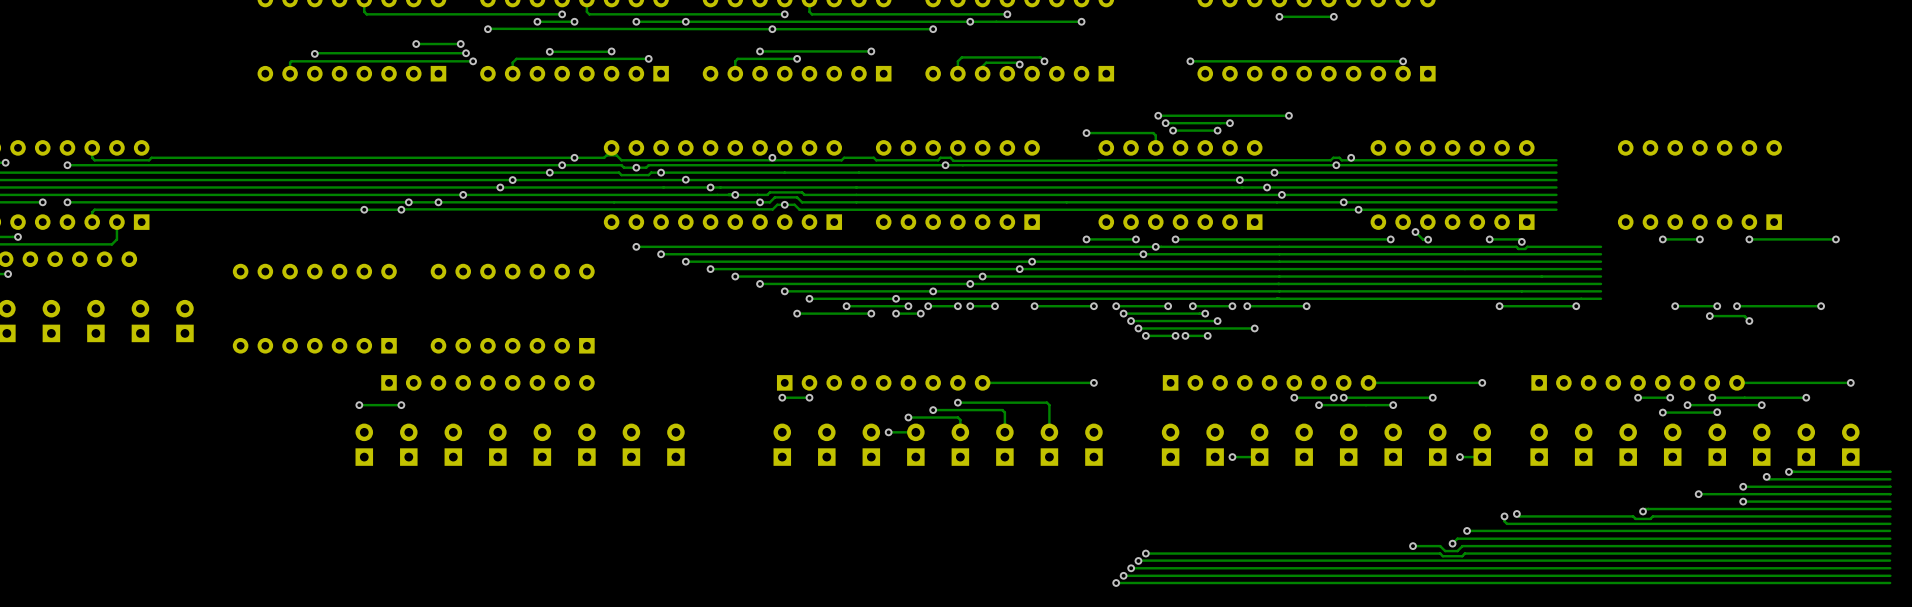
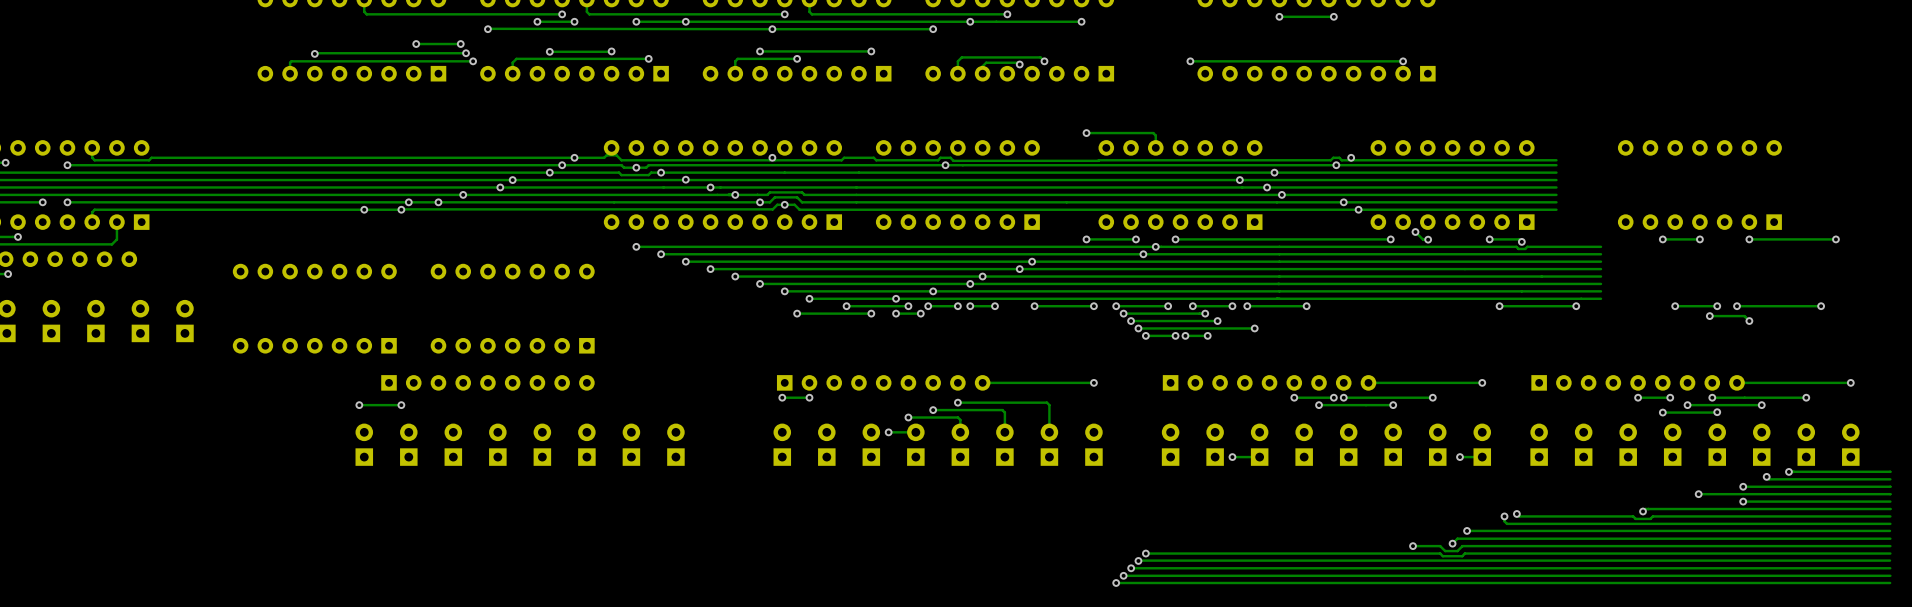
via: (1158, 115) -> none
track: (1288, 115) (1158, 115) -> none
via: (1288, 115) -> none
via: (1165, 123) -> none
track: (1229, 123) (1165, 123) -> none
via: (1229, 123) -> none
via: (1173, 130) -> none
track: (1217, 130) (1173, 130) -> none
via: (1217, 130) -> none

